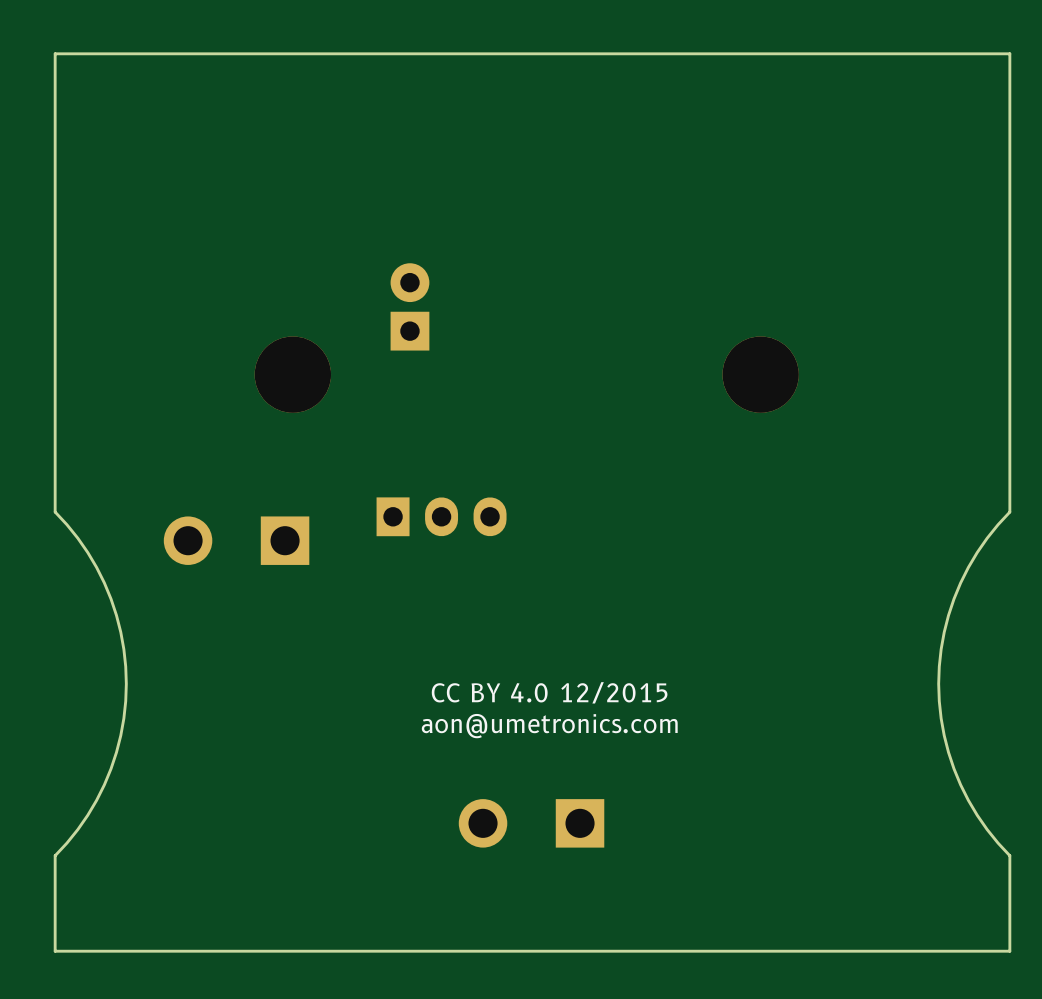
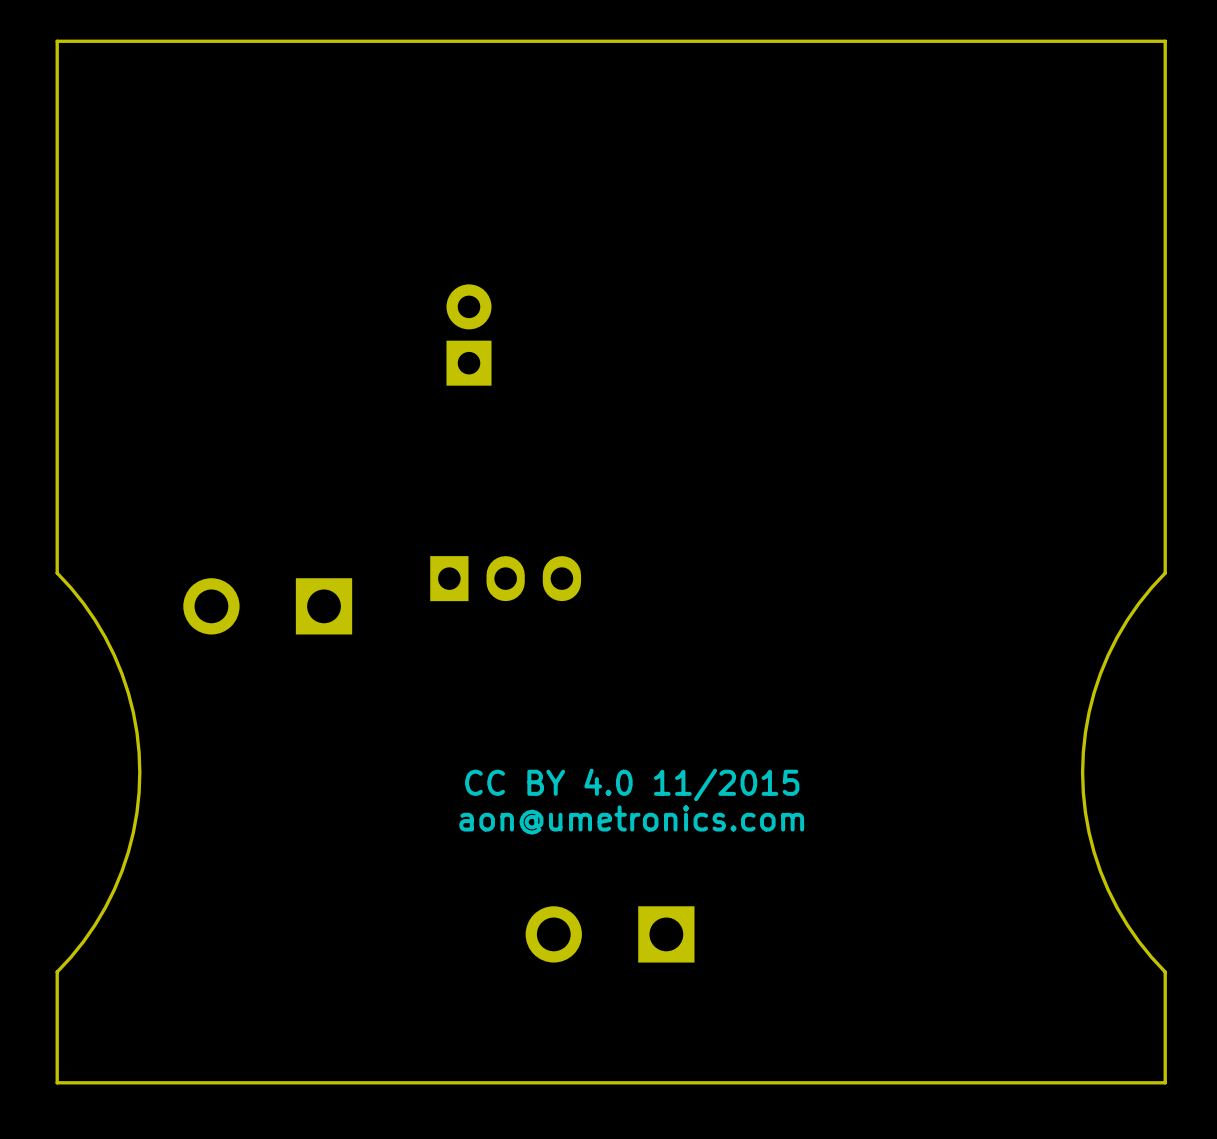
part: (292, 374) -> none
part: (760, 374) -> none
text: CC BY 4.0 12/2015 (549, 692) -> CC BY 4.0 11/2015 (632, 784)

